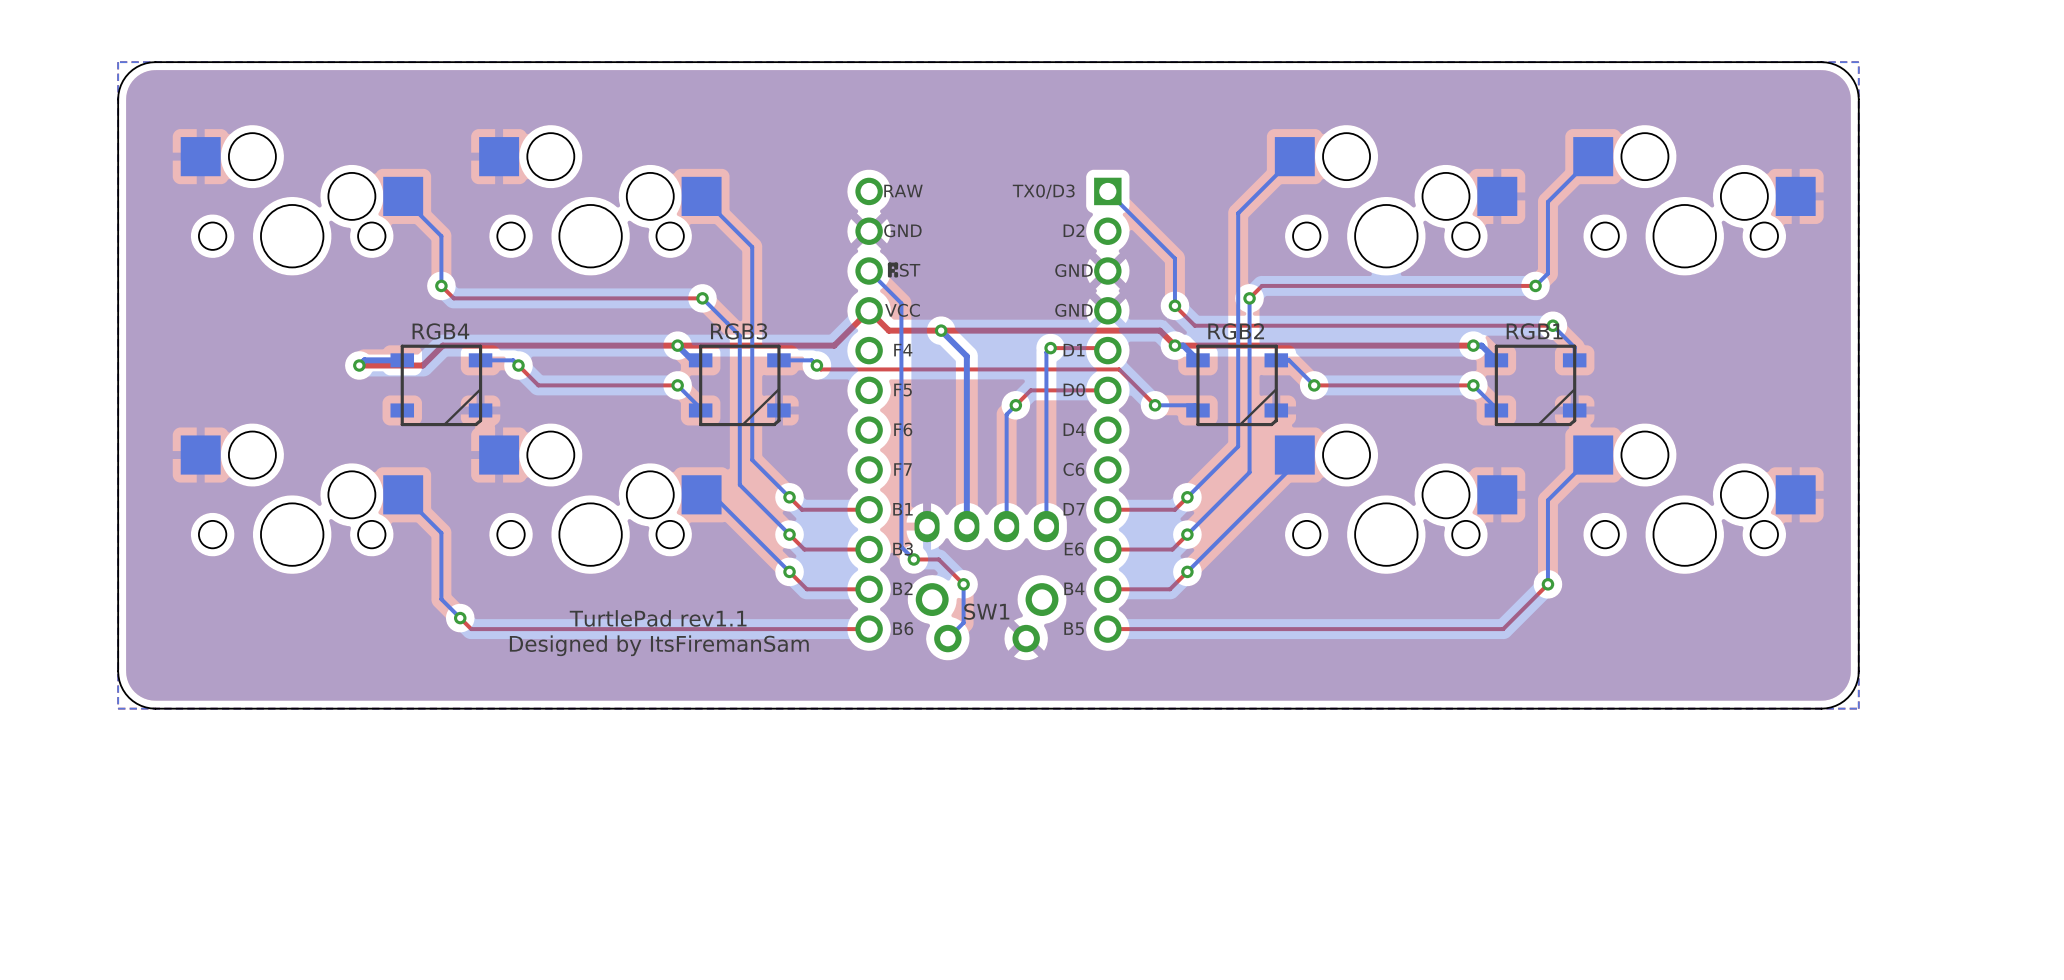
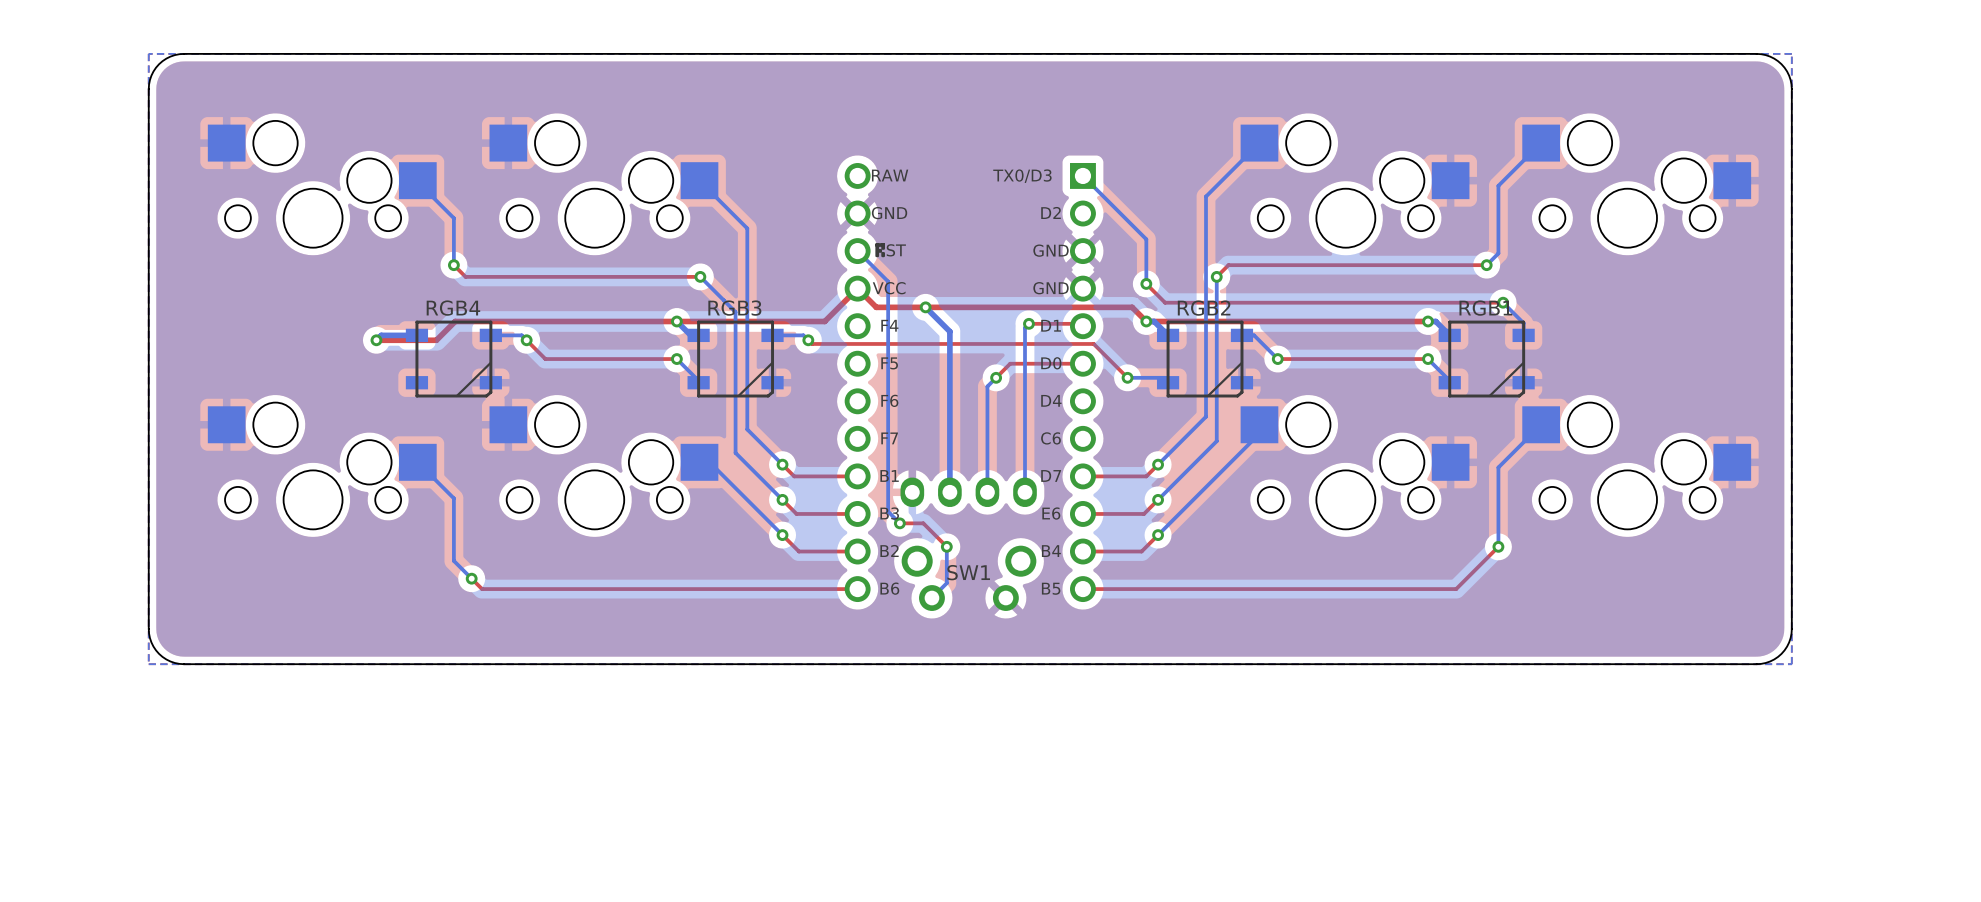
text: TurtlePad rev1.1 (658, 618) -> none
text: Designed by ItsFiremanSam (659, 645) -> none

